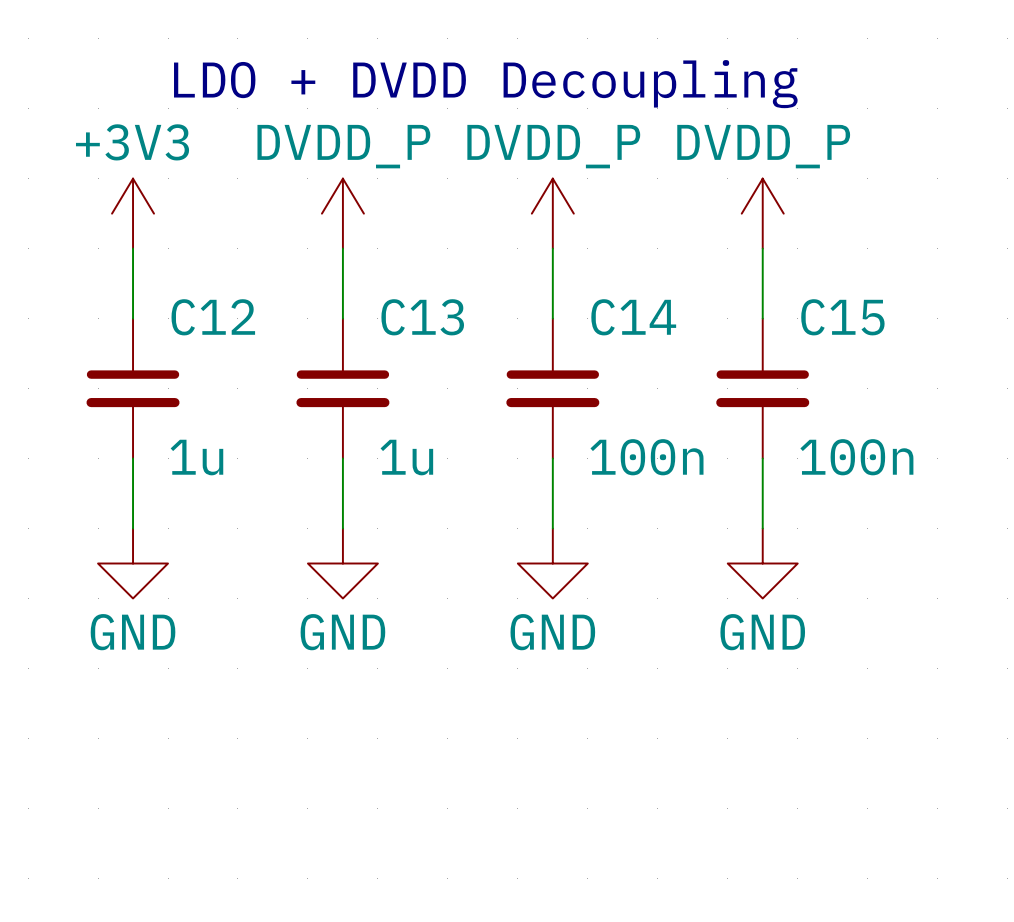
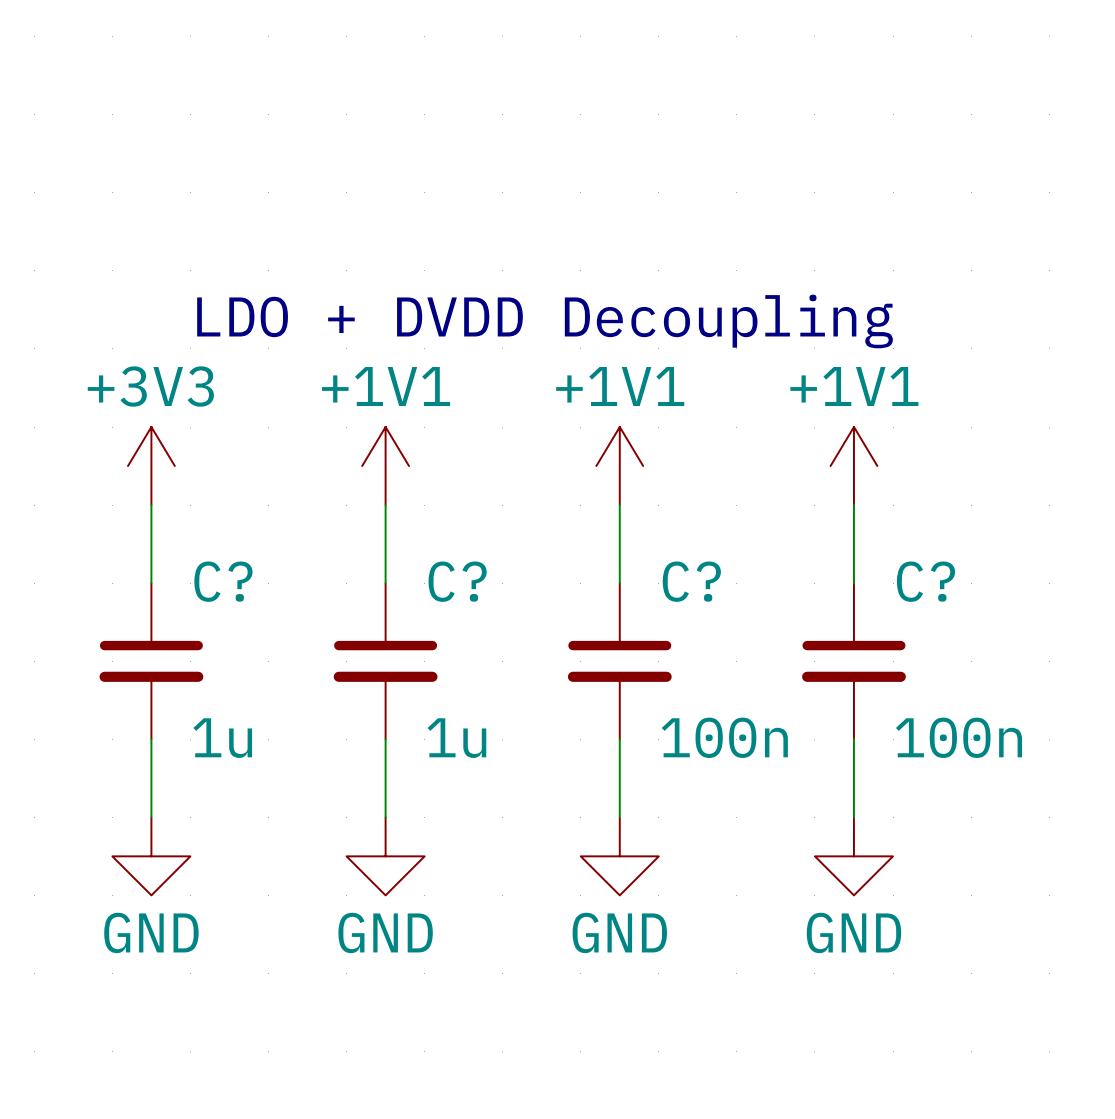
text position: LDO + DVDD Decoupling (485, 84) -> LDO + DVDD Decoupling (545, 321)
power symbol position: +3V3 (133, 213) -> +3V3 (151, 466)
power symbol: DVDD_P (342, 213) -> none
power symbol: DVDD_P (552, 213) -> none
power symbol: DVDD_P (762, 213) -> none
wire: (133, 248) (133, 318) -> (151, 739) (151, 817)
wire: (342, 248) (342, 318) -> (385, 739) (385, 817)
wire: (552, 248) (552, 318) -> (619, 739) (619, 817)
wire: (762, 248) (762, 318) -> (853, 739) (853, 817)
C12: 1u (133, 388) -> none
C13: 1u (342, 388) -> none
C14: 100n (552, 388) -> none
C15: 100n (762, 388) -> none
power symbol: none -> +1V1 (385, 466)
power symbol: none -> +1V1 (619, 466)
power symbol: none -> +1V1 (853, 466)
power symbol: GND (133, 563) -> none
power symbol: GND (342, 563) -> none
power symbol: GND (552, 563) -> none
power symbol: GND (762, 563) -> none
C?: none -> 1u (151, 661)
C?: none -> 1u (385, 661)
C?: none -> 100n (619, 661)
C?: none -> 100n (853, 661)
power symbol: none -> GND (151, 856)
power symbol: none -> GND (385, 856)
power symbol: none -> GND (619, 856)
power symbol: none -> GND (853, 856)

